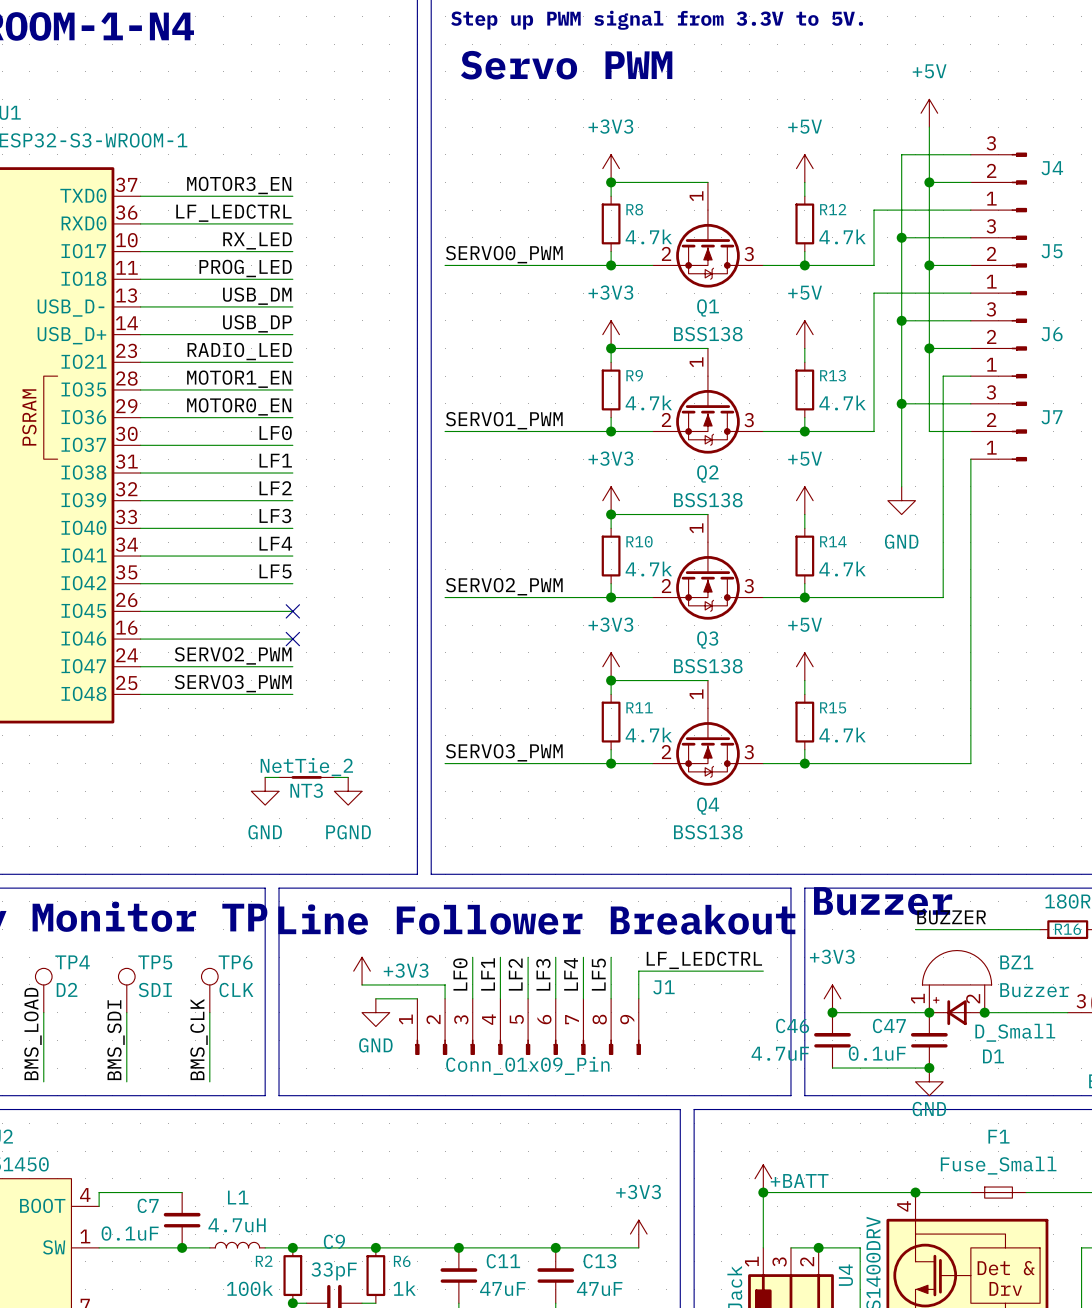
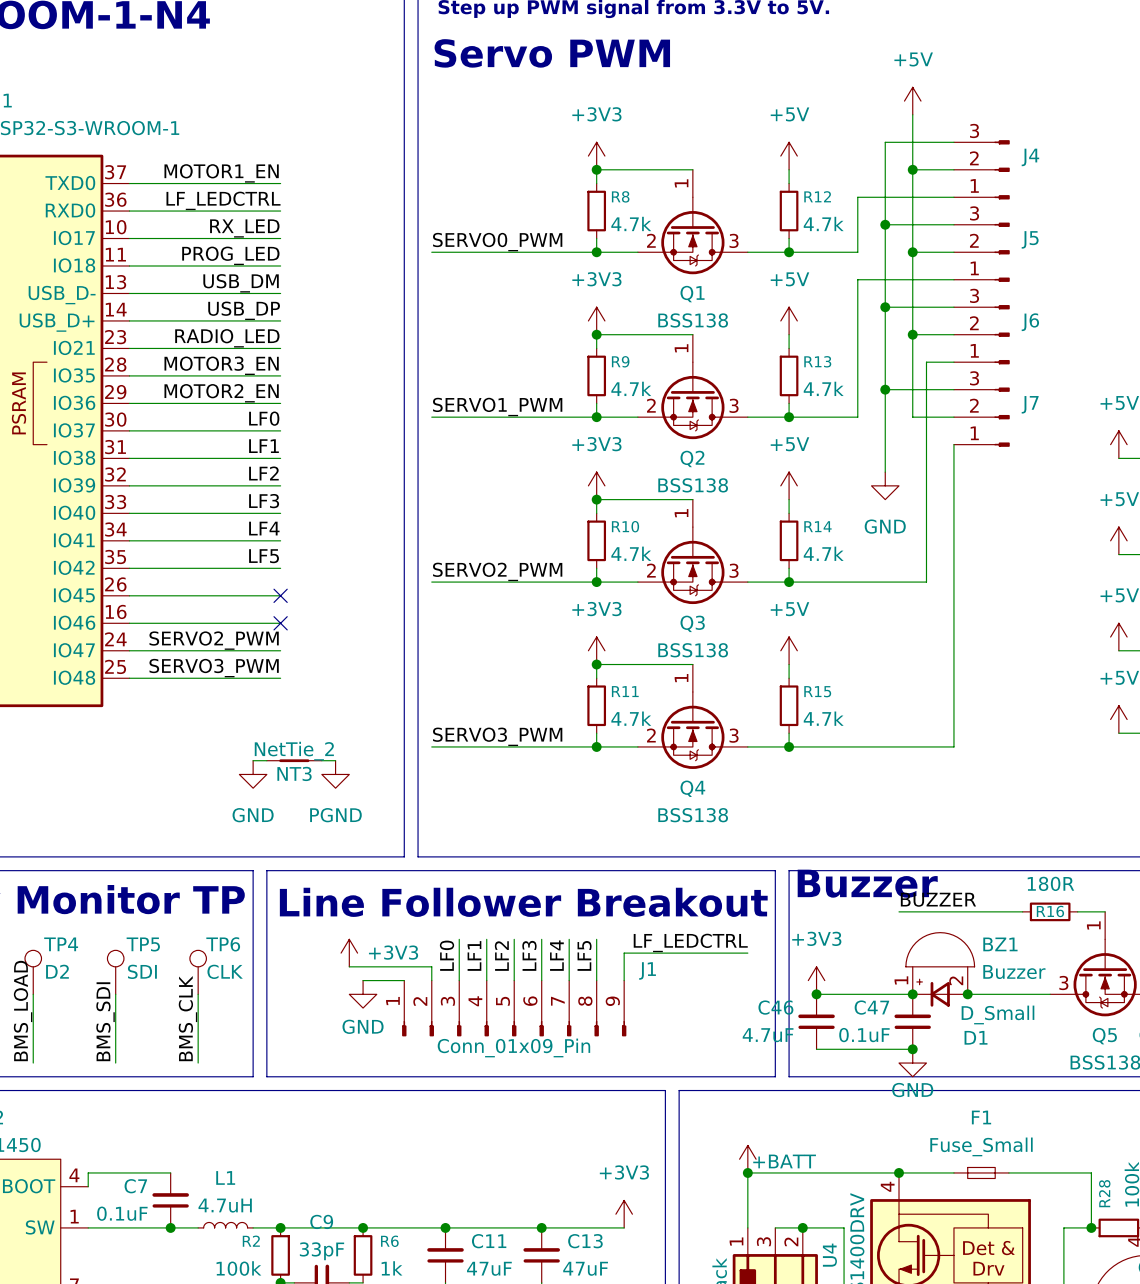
label: MOTOR3_EN (239, 185) -> MOTOR1_EN (221, 173)
label: MOTOR1_EN (239, 379) -> MOTOR3_EN (221, 365)
label: MOTOR0_EN (239, 406) -> MOTOR2_EN (221, 393)

